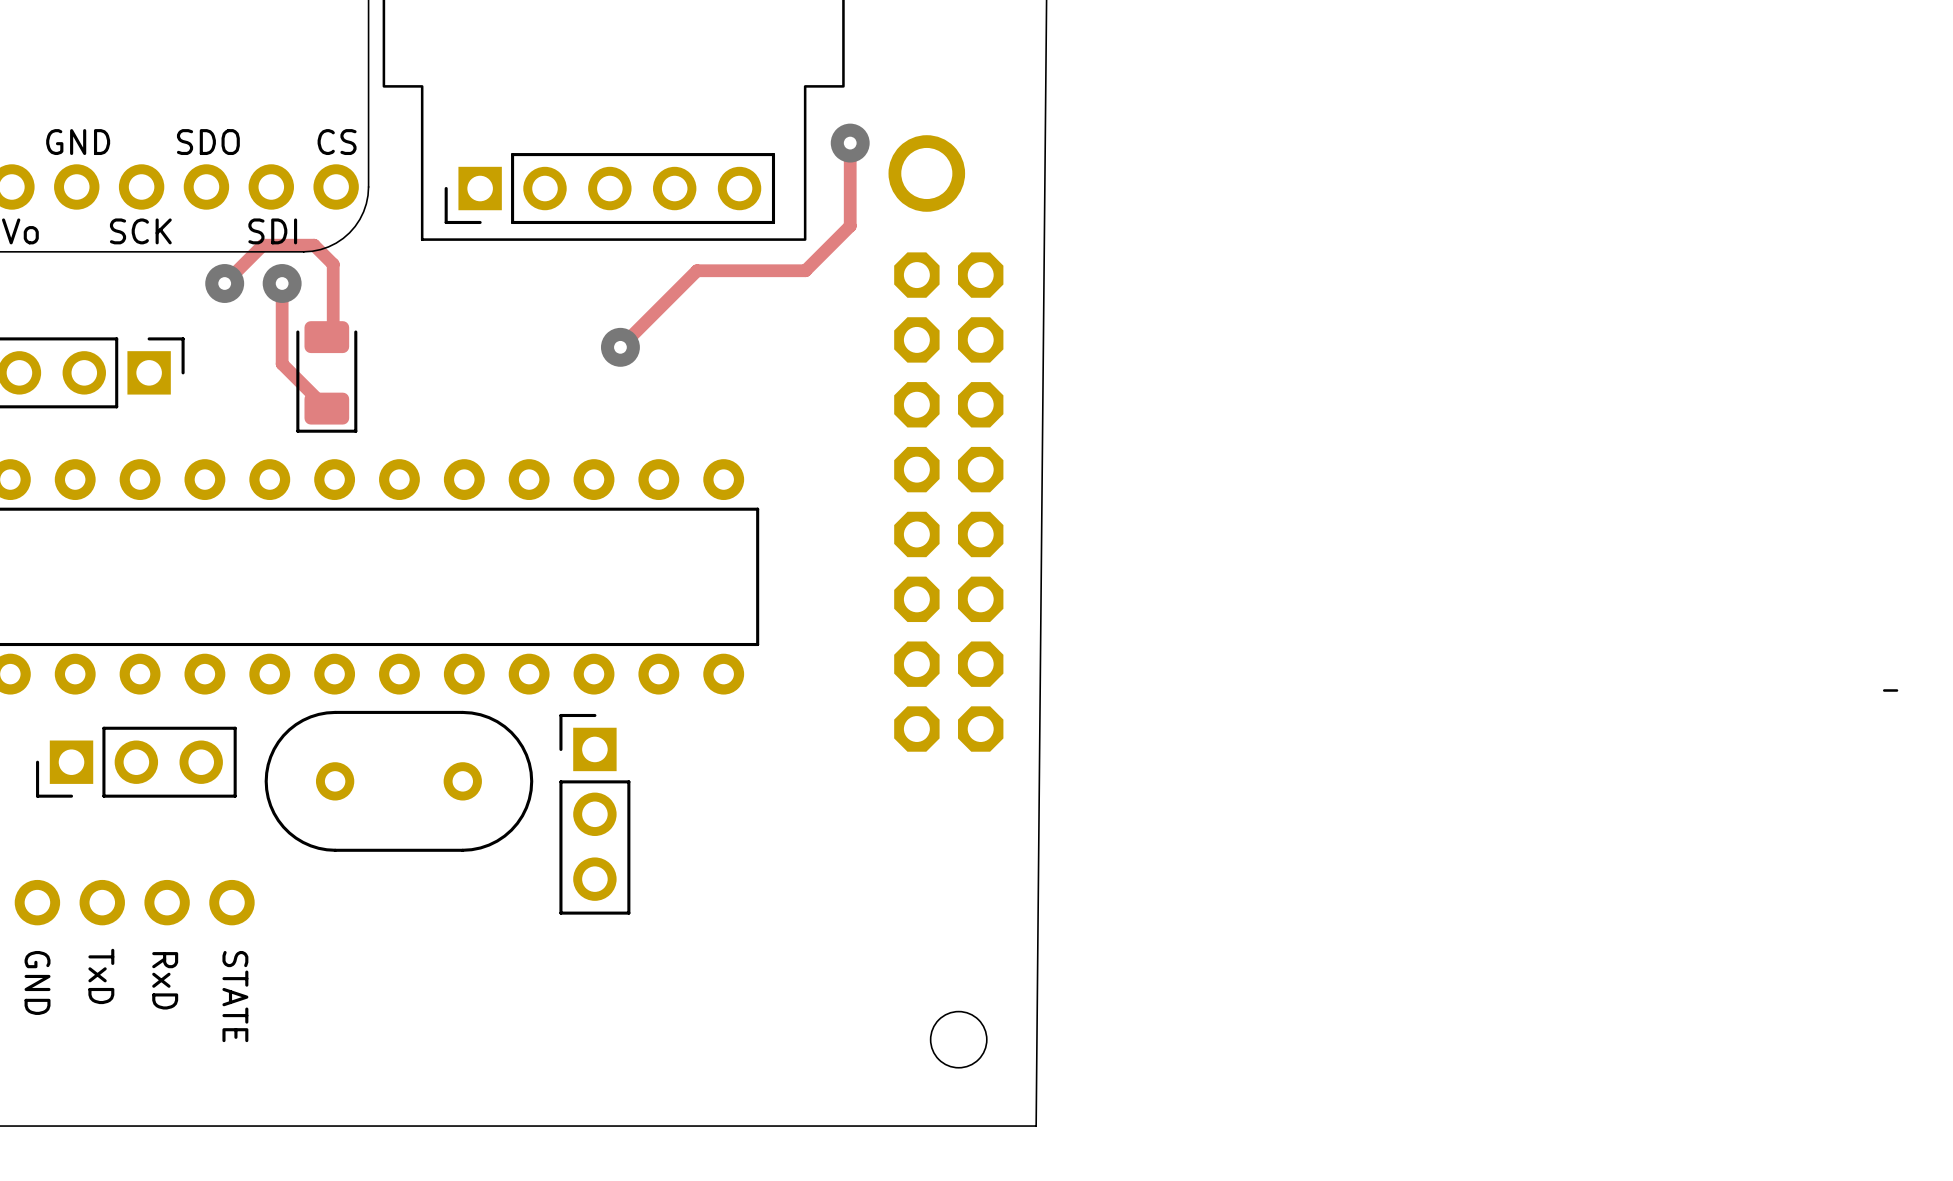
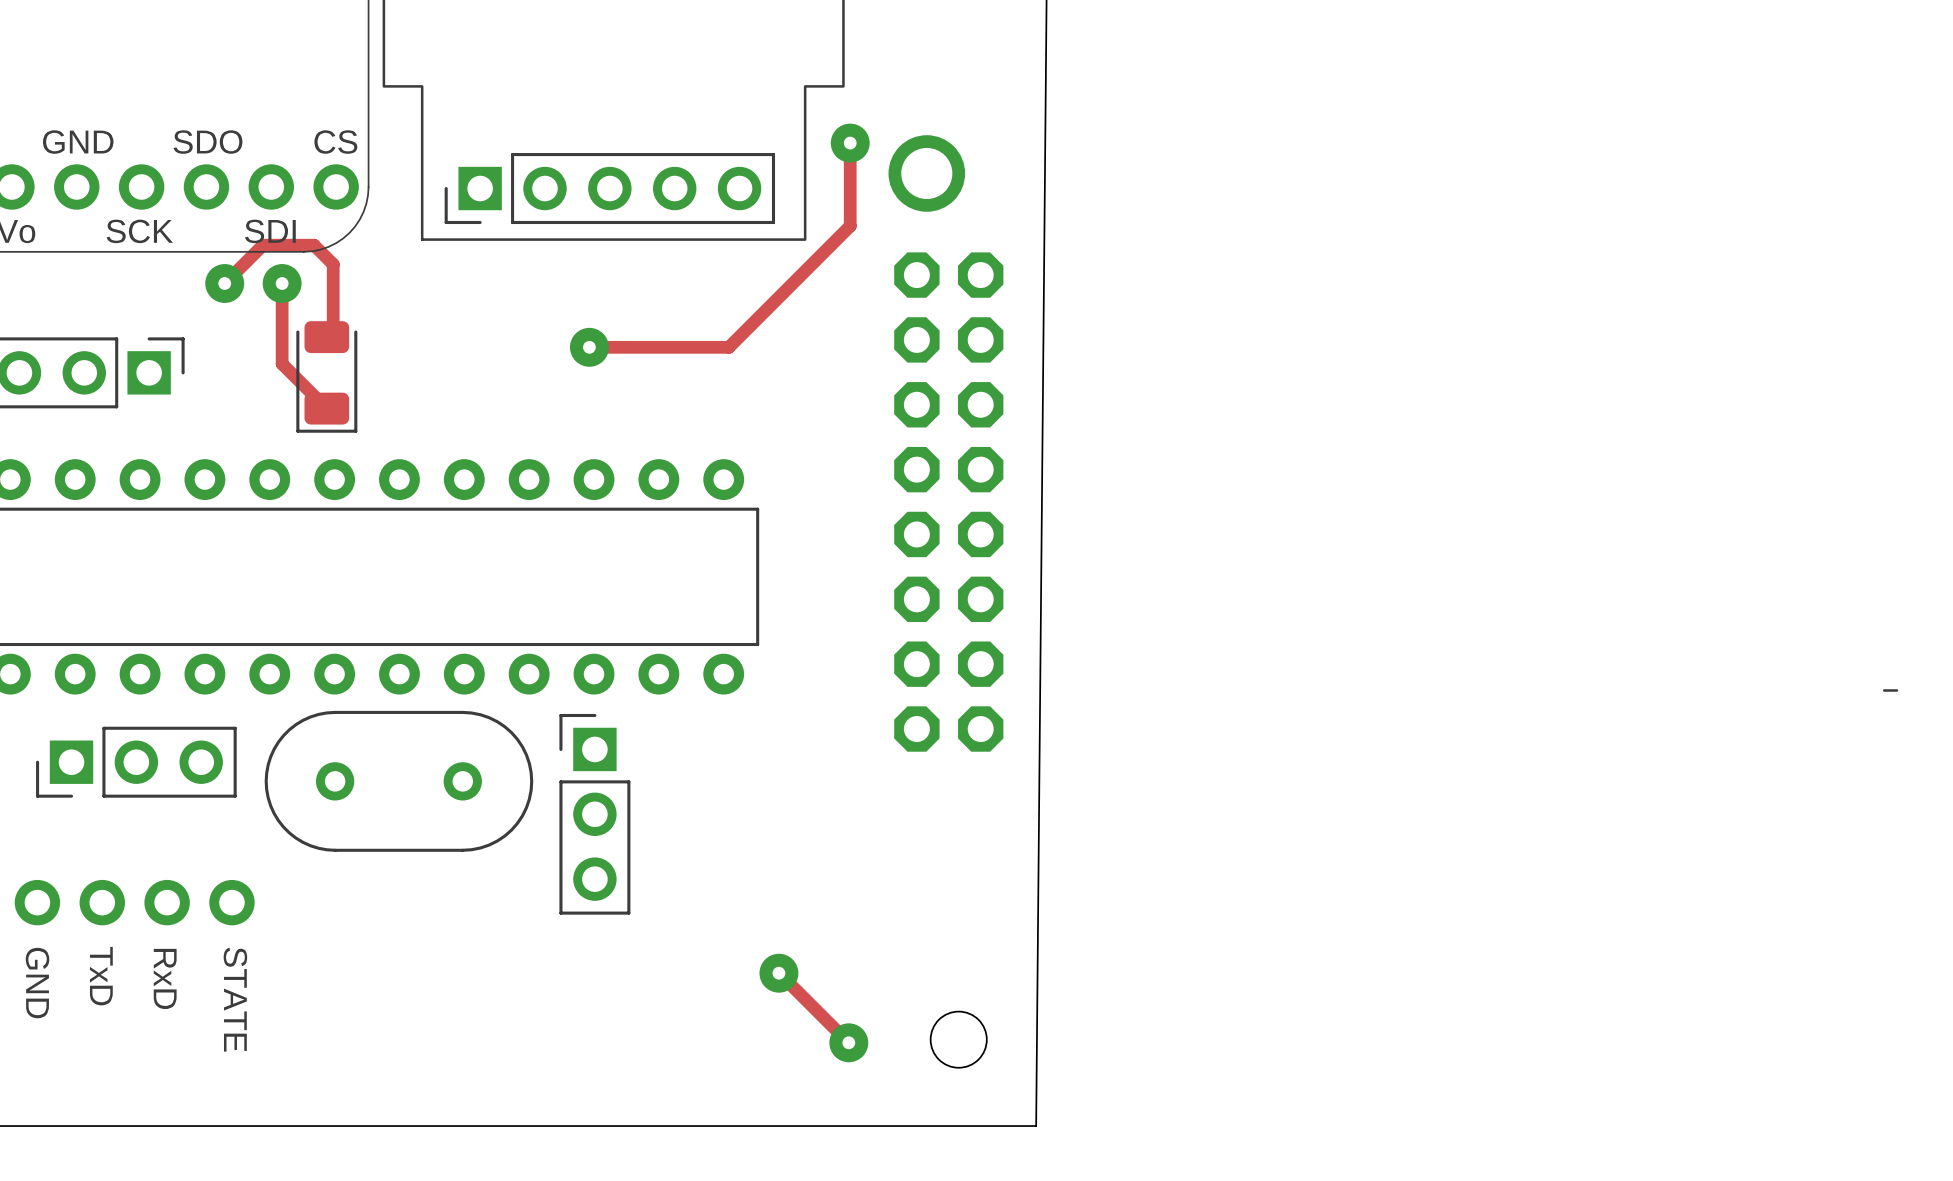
track: (805, 270) (697, 270) (620, 347) -> (805, 270) (728, 347) (589, 347)
via position: (620, 347) -> (589, 347)
via: none -> (778, 973)
track: none -> (779, 973) (848, 1042)
via: none -> (848, 1042)

